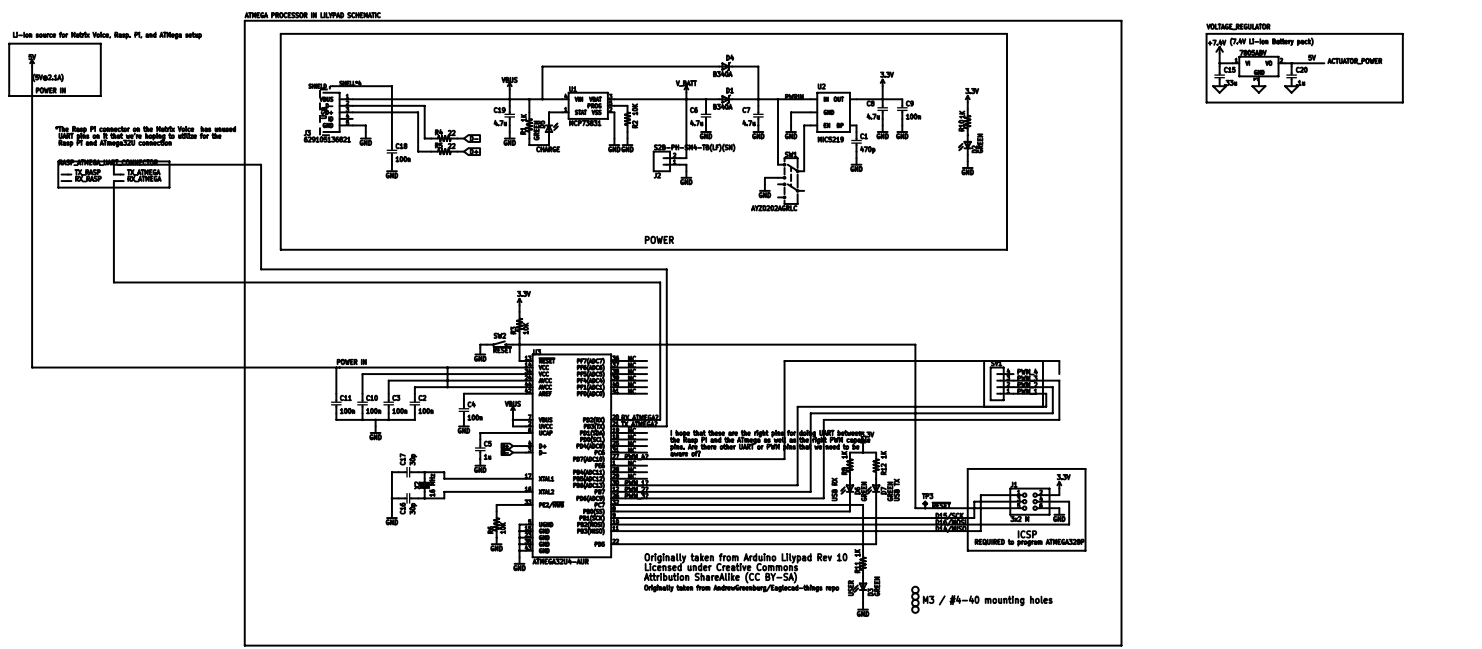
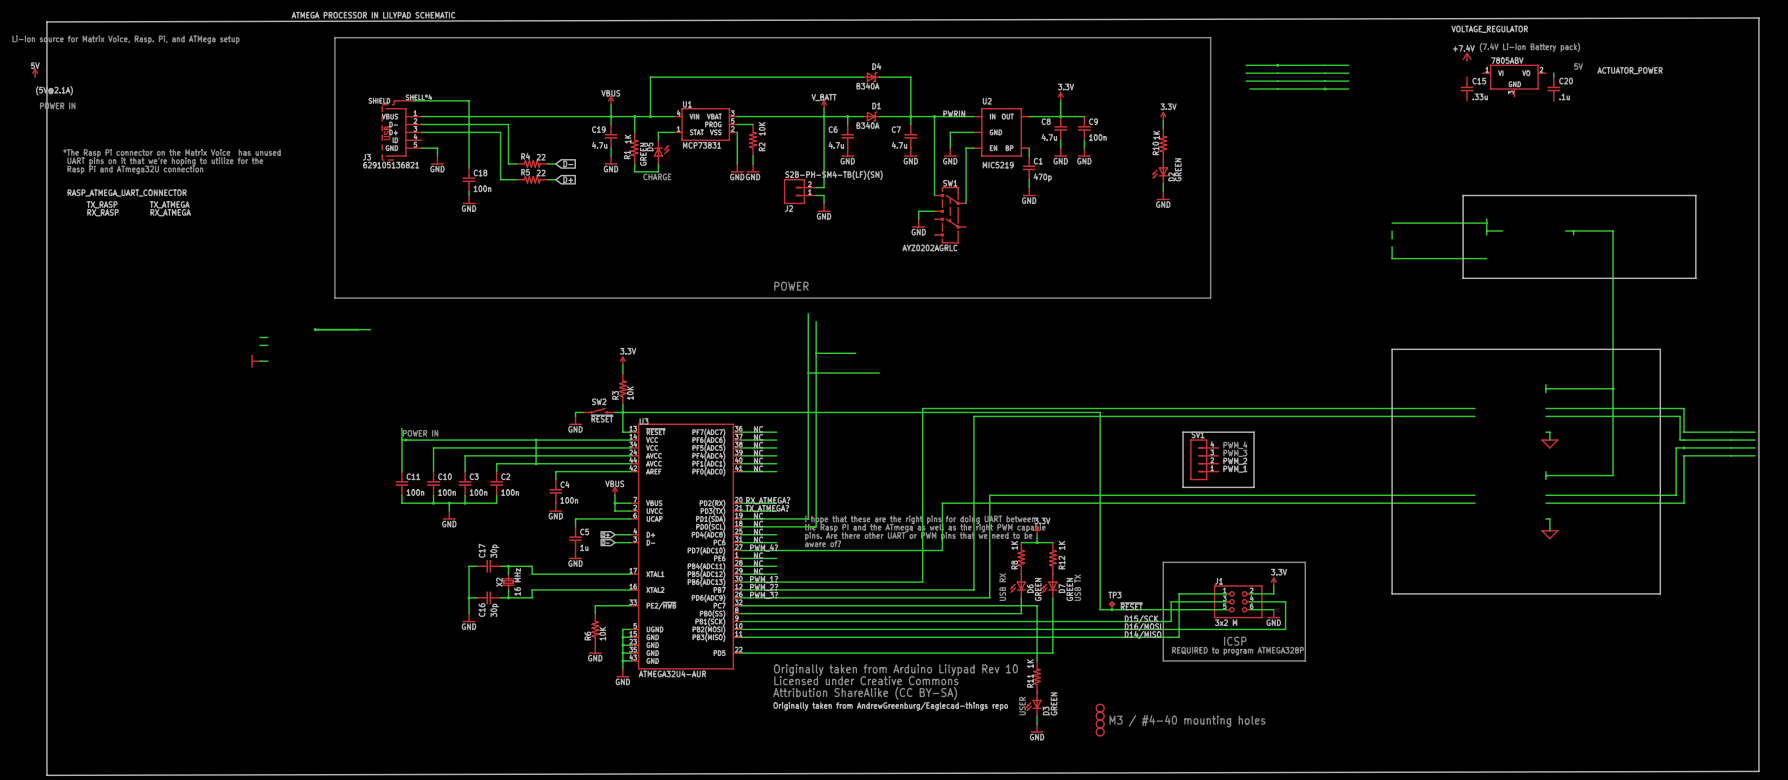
line: (244, 20) (244, 645) (1121, 645) (1121, 20) (244, 20) -> (1758, 17) (46, 21) (46, 775) (1758, 771) (1758, 17)
line: (1206, 33) (1206, 102) (1402, 102) (1402, 33) (1206, 33) -> none
line: (9, 43) (100, 43) (100, 96) (9, 96) (9, 43) -> none
wire: (1219, 53) (1219, 66) -> none
wire: none -> (1246, 65) (1348, 65)
junction: none -> (1277, 65)
wire: none -> (1246, 73) (1348, 73)
wire: (1219, 63) (1232, 63) -> none
wire: (1285, 63) (1324, 63) -> none
wire: (32, 66) (32, 367) (336, 367) -> (401, 428) (401, 440)
wire: none -> (1246, 81) (1348, 81)
wire: none -> (1250, 88) (1348, 88)
wire: (1258, 82) (1258, 86) -> none
power symbol: (1219, 89) -> none
power symbol: (1258, 89) -> none
power symbol: (1291, 89) -> none
line: (58, 161) (58, 187) (169, 187) (169, 161) (58, 161) -> none
line: none -> (1463, 195) (1463, 278) (1695, 278) (1695, 195) (1463, 195)
part: (66, 174) -> none
wire: (113, 174) (113, 164) (261, 164) (261, 269) (666, 269) (666, 426) (647, 426) -> none
part: (119, 174) -> none
part: (66, 181) -> none
wire: (113, 181) (113, 282) (218, 282) -> none
part: (119, 181) -> none
wire: none -> (1486, 219) (1486, 234)
wire: none -> (1392, 223) (1486, 223)
wire: none -> (1392, 230) (1392, 238)
wire: none -> (1486, 230) (1502, 230)
wire: none -> (1565, 230) (1612, 230) (1612, 475) (1545, 475)
wire: none -> (1573, 230) (1573, 234)
wire: none -> (1392, 246) (1392, 258) (1486, 258)
wire: none -> (808, 313) (808, 518) (776, 518)
wire: none -> (816, 321) (816, 526) (776, 526)
wire: none -> (315, 329) (370, 329)
junction: none -> (315, 329)
wire: (225, 282) (660, 282) (660, 419) (647, 419) -> none
wire: none -> (259, 345) (267, 345)
line: none -> (1392, 349) (1660, 349) (1660, 593) (1392, 593) (1392, 349)
wire: none -> (816, 353) (855, 353)
power symbol: none -> (255, 361)
wire: none -> (259, 361) (267, 361)
wire: none -> (808, 373) (879, 373)
wire: none -> (1545, 384) (1545, 392)
wire: none -> (1545, 388) (1612, 388)
wire: none -> (1545, 408) (1684, 408) (1684, 432) (1755, 432)
wire: none -> (1474, 416) (973, 416) (973, 495)
wire: none -> (1545, 416) (1680, 416) (1680, 440) (1755, 440)
wire: none -> (1545, 432) (1549, 432) (1549, 440)
power symbol: none -> (1549, 444)
wire: (1059, 374) (1059, 360) (784, 360) (784, 419) -> none
wire: none -> (1755, 447) (1676, 447) (1676, 495) (1545, 495)
wire: (1013, 380) (1059, 380) (1059, 419) -> (1474, 503) (1273, 503)
wire: none -> (1755, 455) (1684, 455) (1684, 503) (1545, 503)
wire: (1013, 387) (1052, 387) (1052, 413) -> (1474, 495) (1265, 495)
wire: (1013, 393) (1046, 393) (1046, 406) (797, 406) (797, 485) (768, 485) -> (1474, 408) (922, 408) (922, 582)
wire: none -> (1545, 471) (1545, 479)
wire: (810, 413) (823, 413) -> (942, 503) (989, 503) (989, 495)
wire: none -> (1545, 518) (1549, 518) (1549, 530)
power symbol: none -> (1549, 534)

